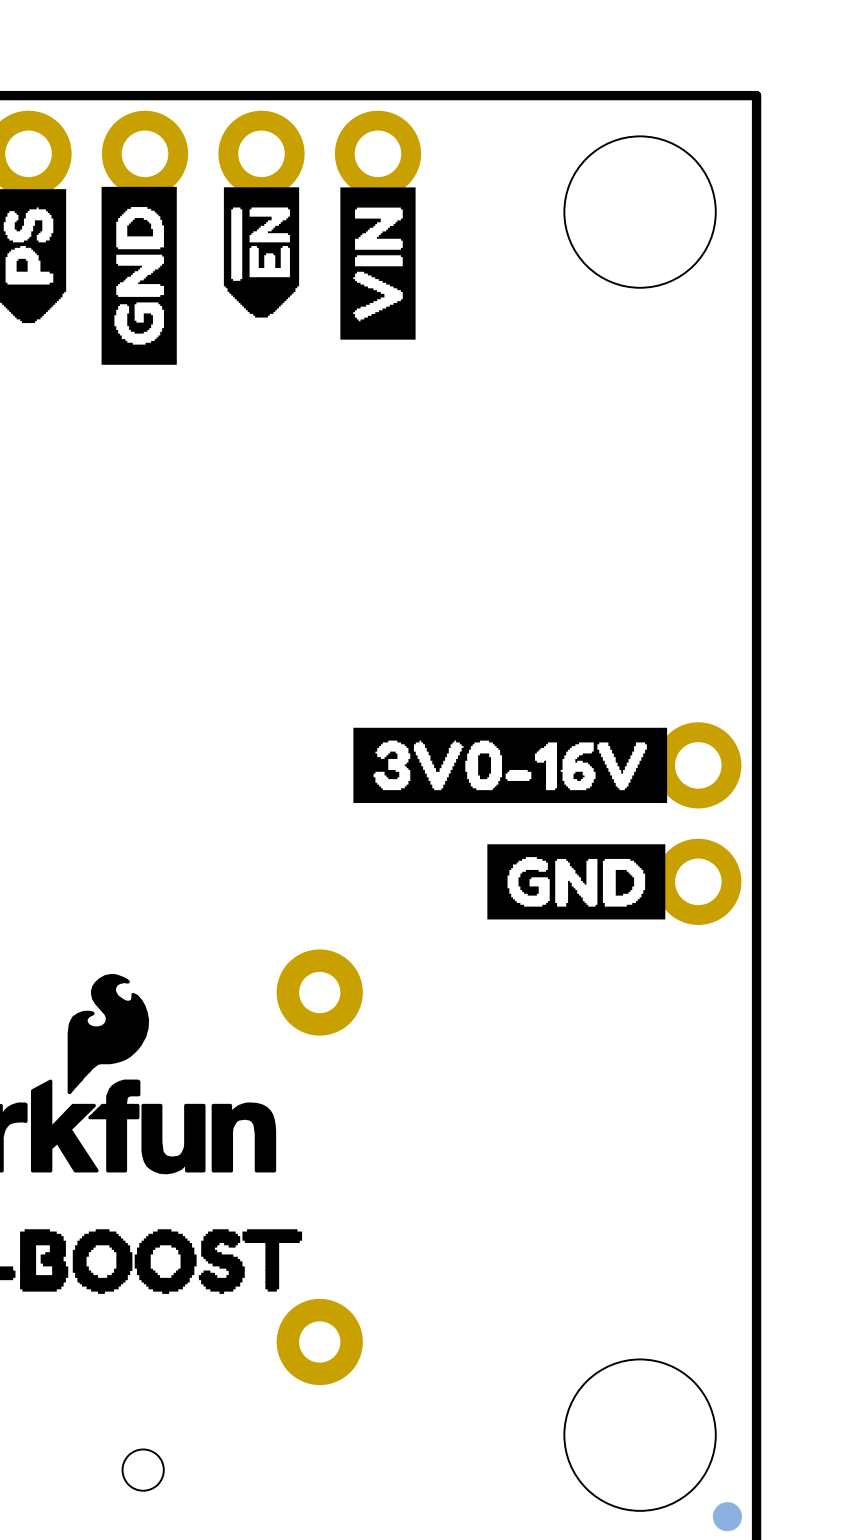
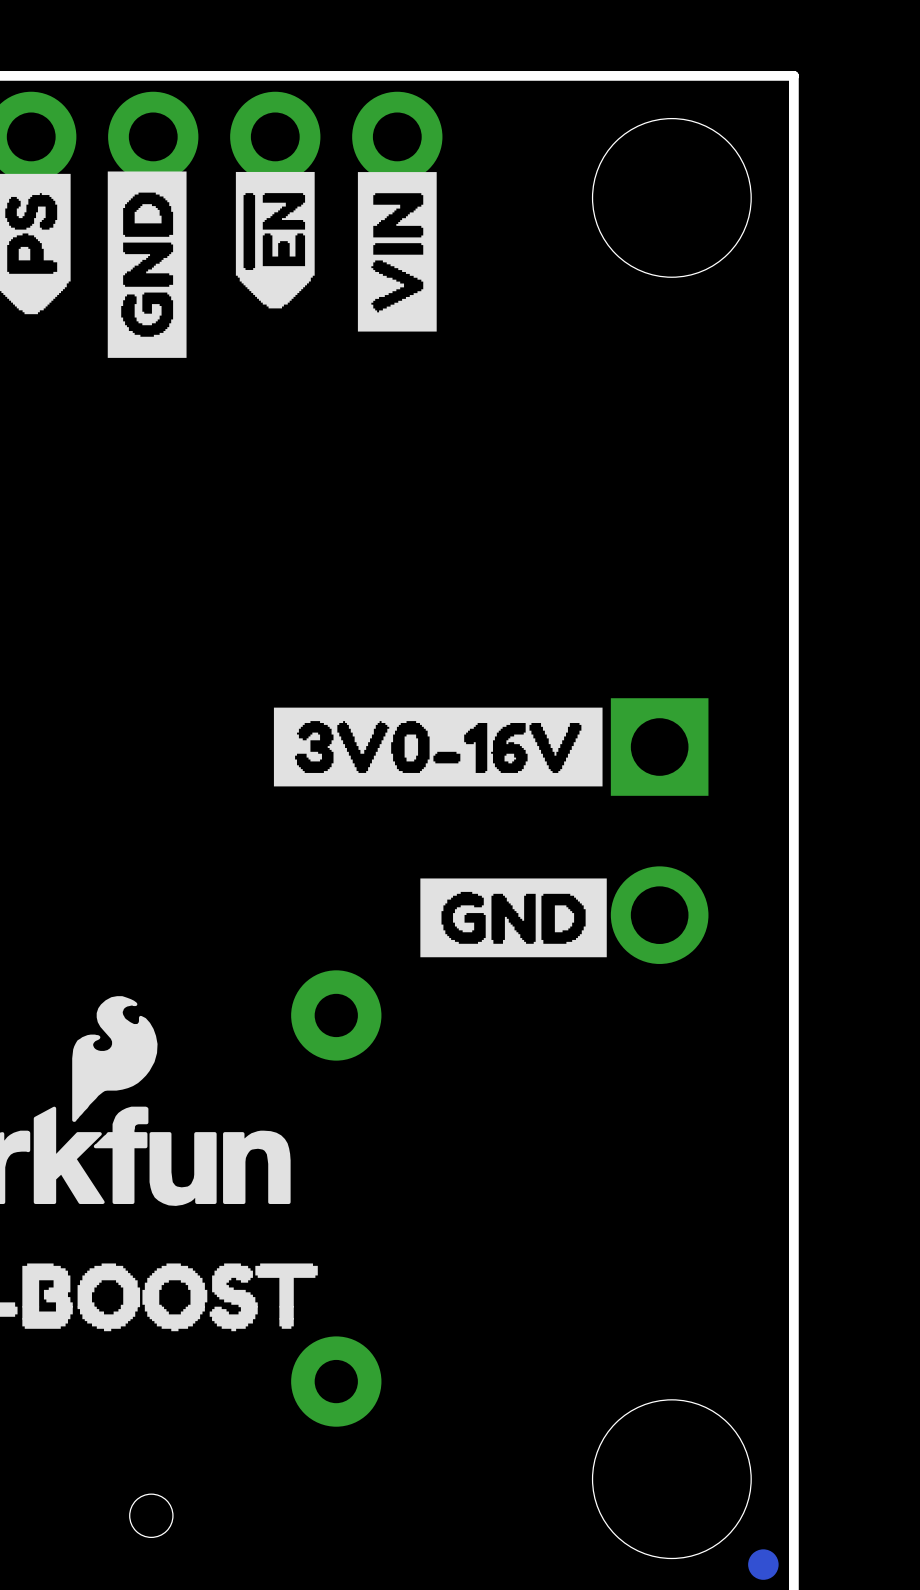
drawing position: (510, 765) -> (438, 747)
part: none -> (659, 831)
part: (698, 823) -> none
drawing position: (576, 881) -> (513, 917)

